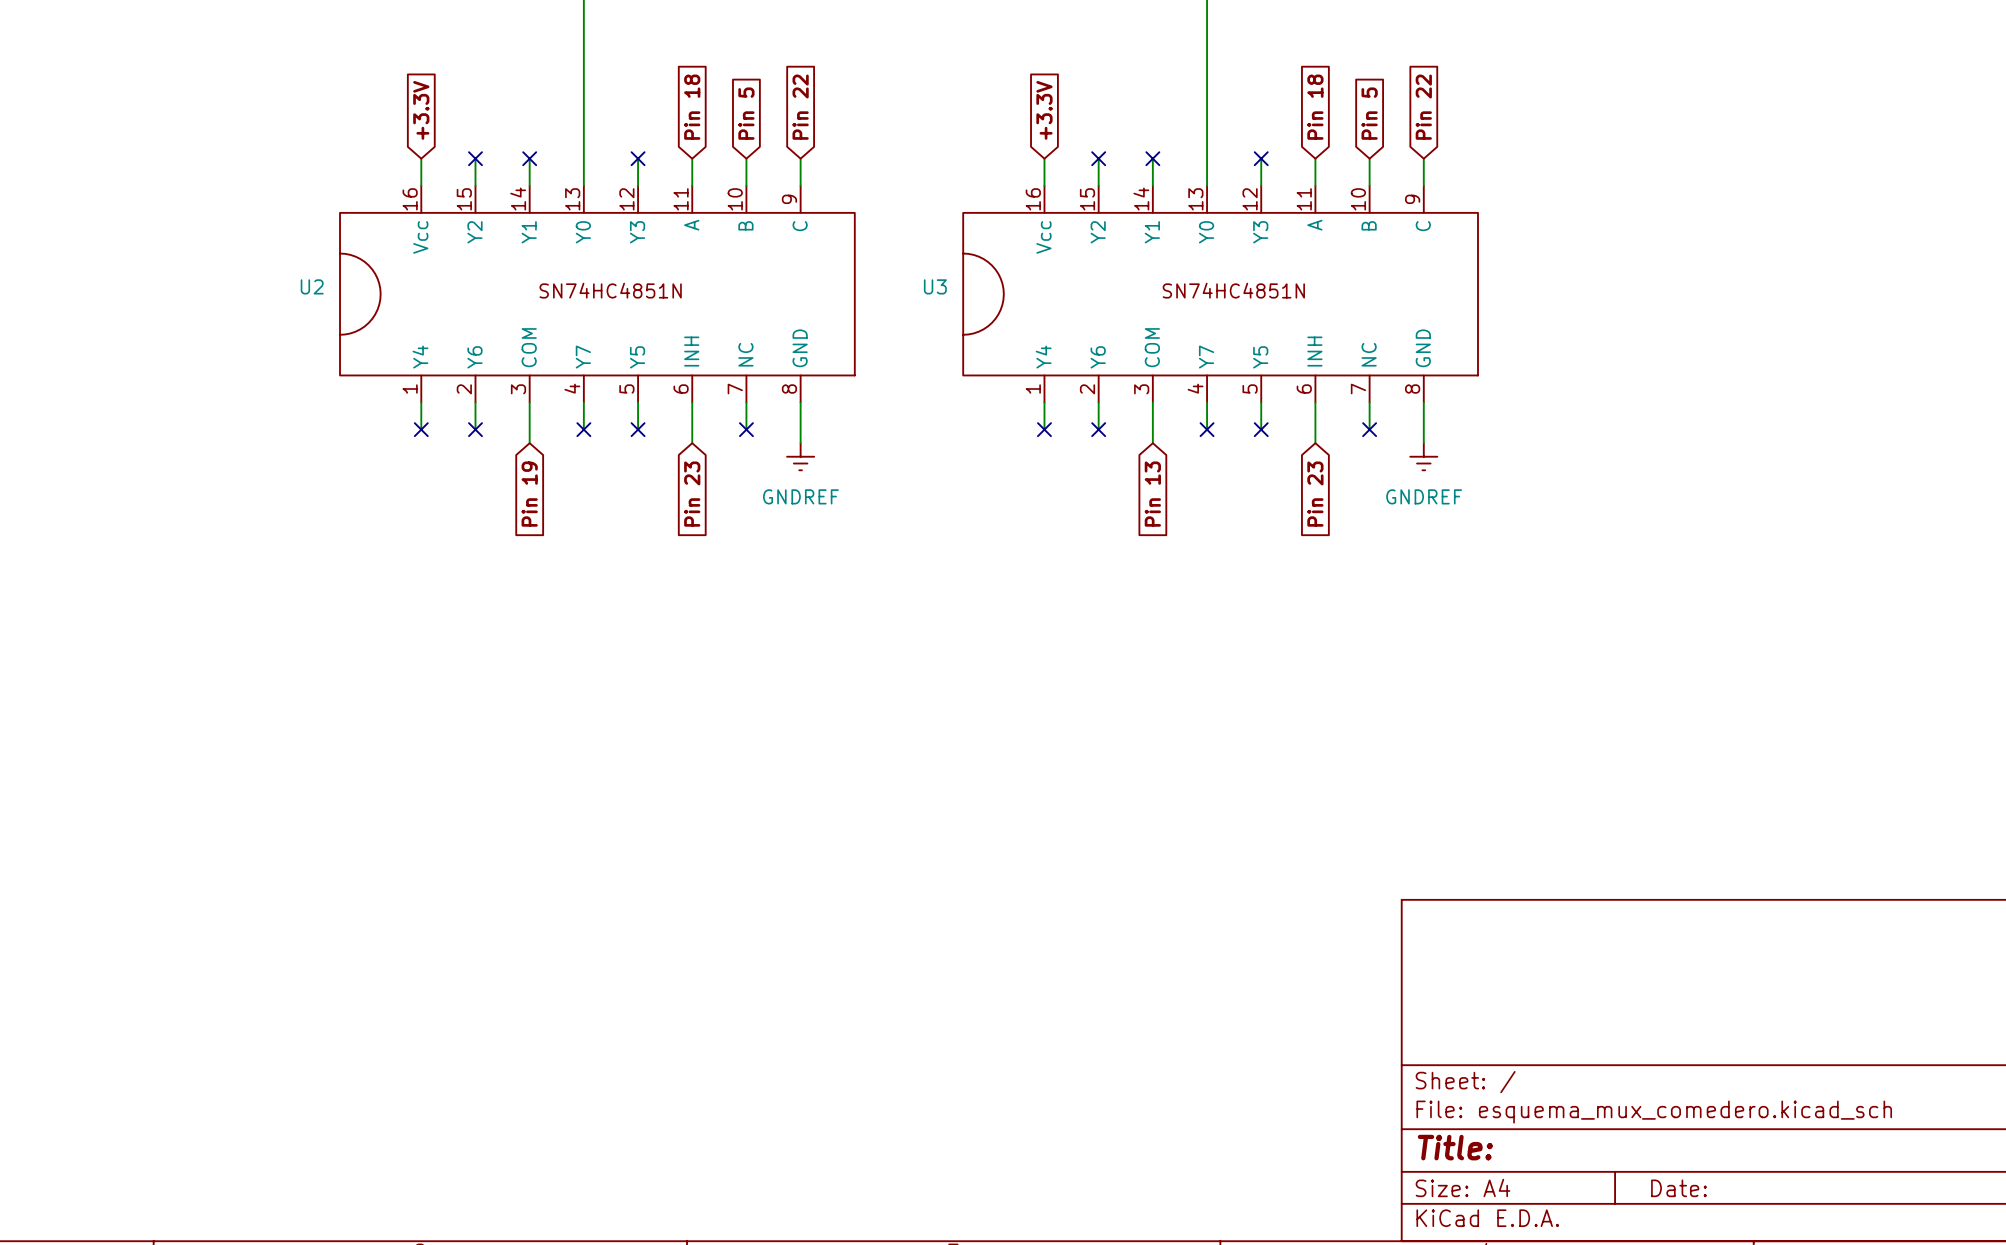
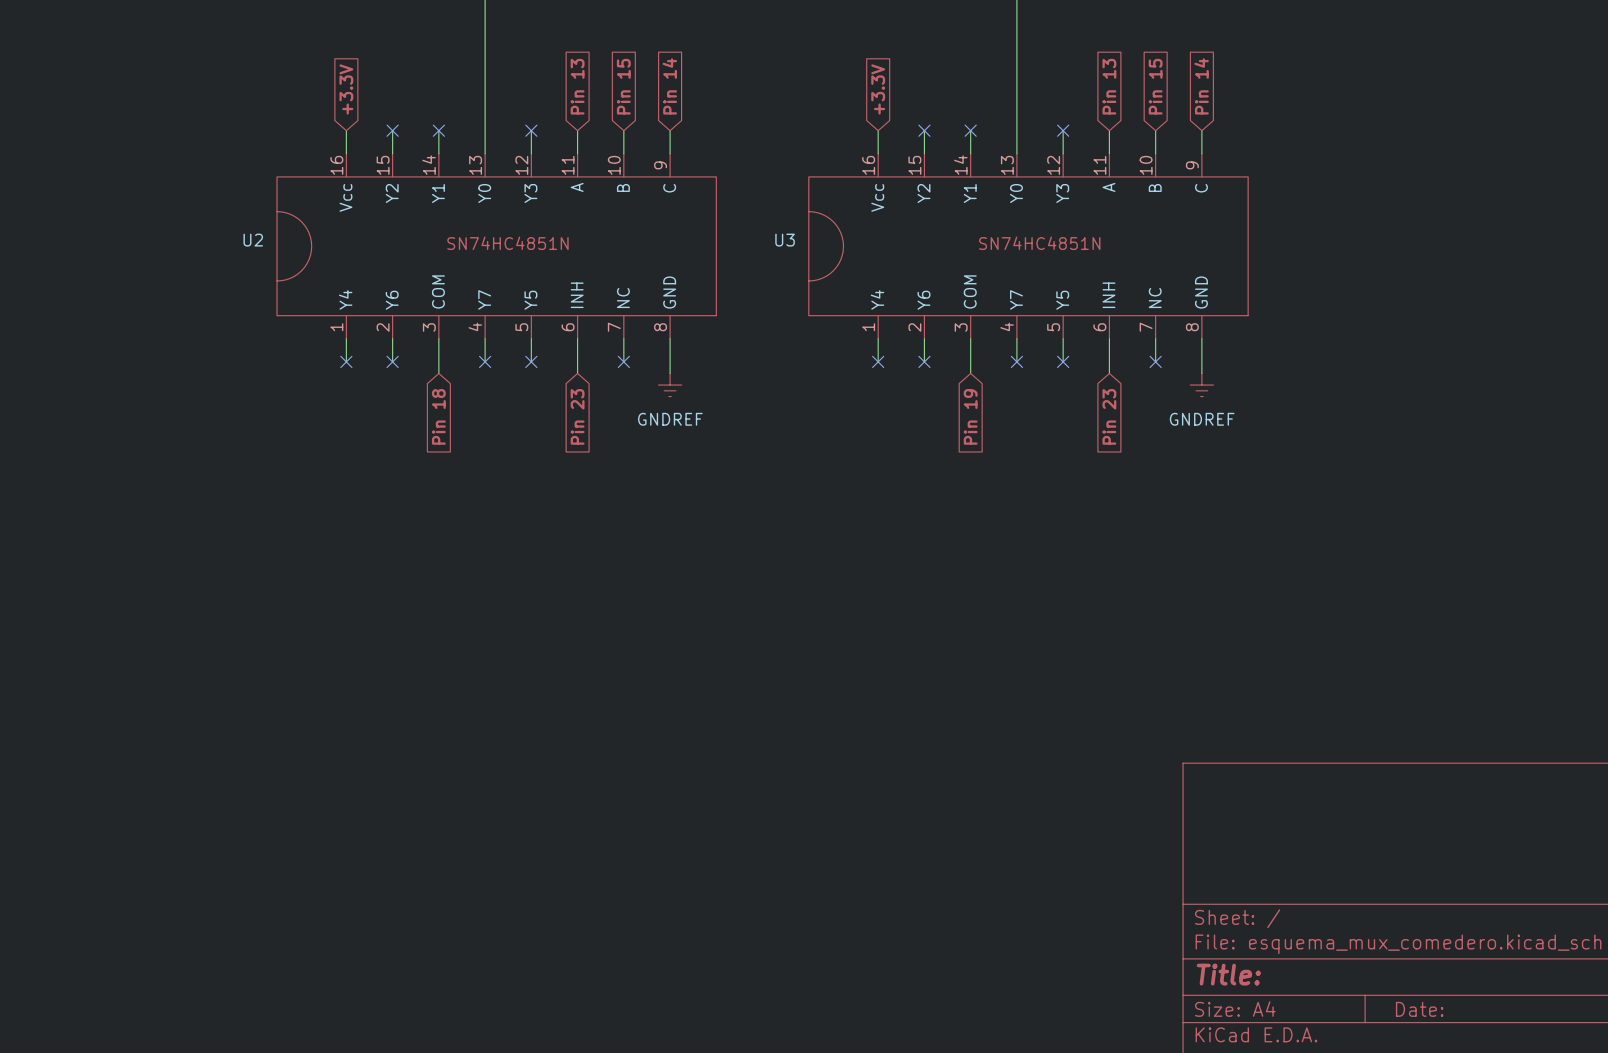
global label: Pin 18 (692, 107) -> Pin 13 (577, 86)
global label: Pin 22 (800, 107) -> Pin 14 (669, 86)
global label: Pin 18 (1315, 107) -> Pin 13 (1109, 86)
global label: Pin 22 (1423, 107) -> Pin 14 (1201, 86)
global label: Pin 5 (746, 113) -> Pin 15 (623, 86)
global label: Pin 5 (1369, 113) -> Pin 15 (1155, 86)
global label: Pin 19 (529, 494) -> Pin 18 (438, 416)
global label: Pin 13 (1152, 494) -> Pin 19 (970, 416)

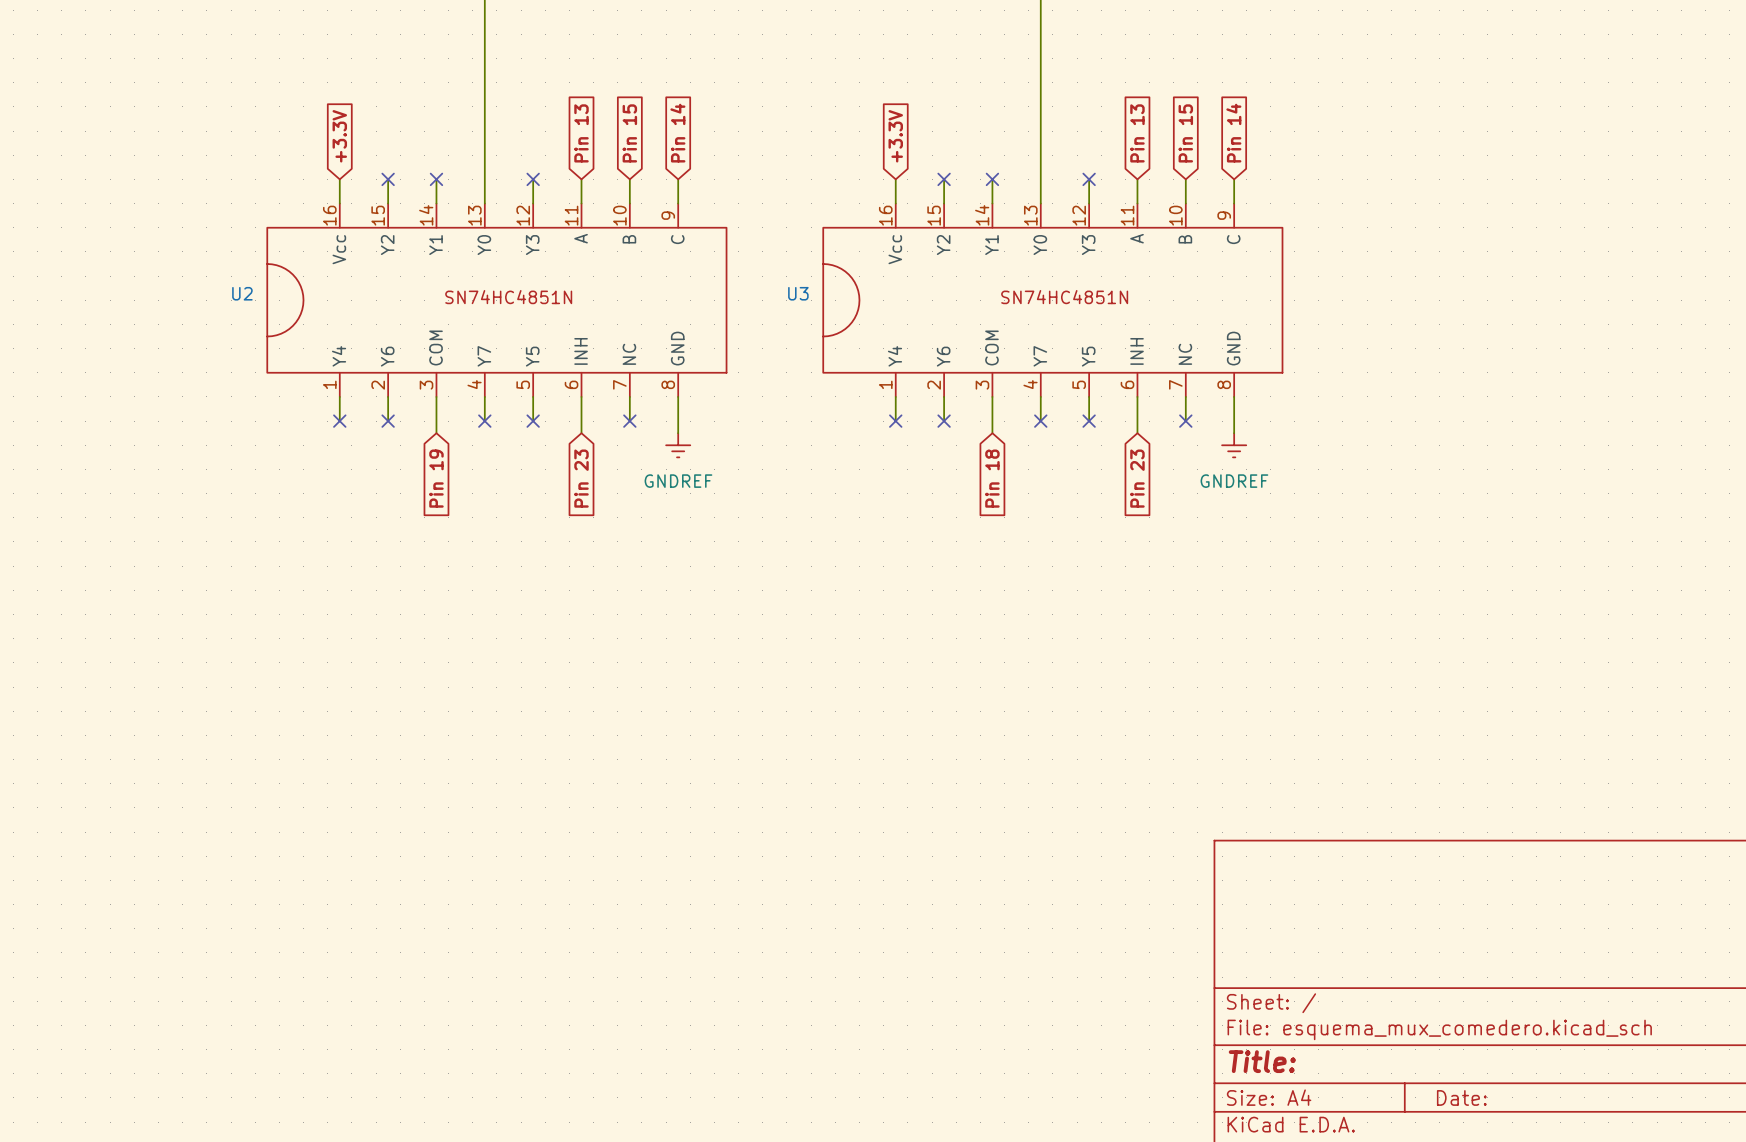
global label: Pin 18 (438, 416) -> Pin 19 (436, 478)
global label: Pin 19 (970, 416) -> Pin 18 (992, 478)

